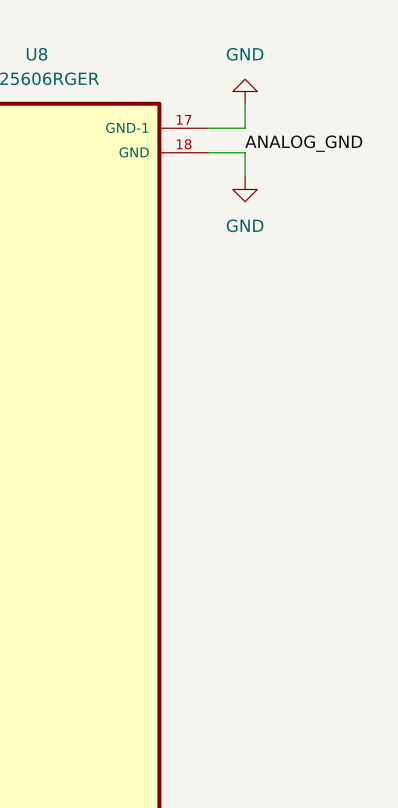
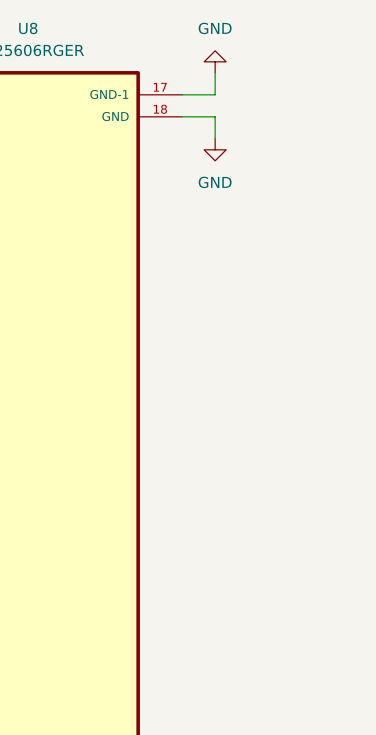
label: ANALOG_GND (303, 143) -> none

